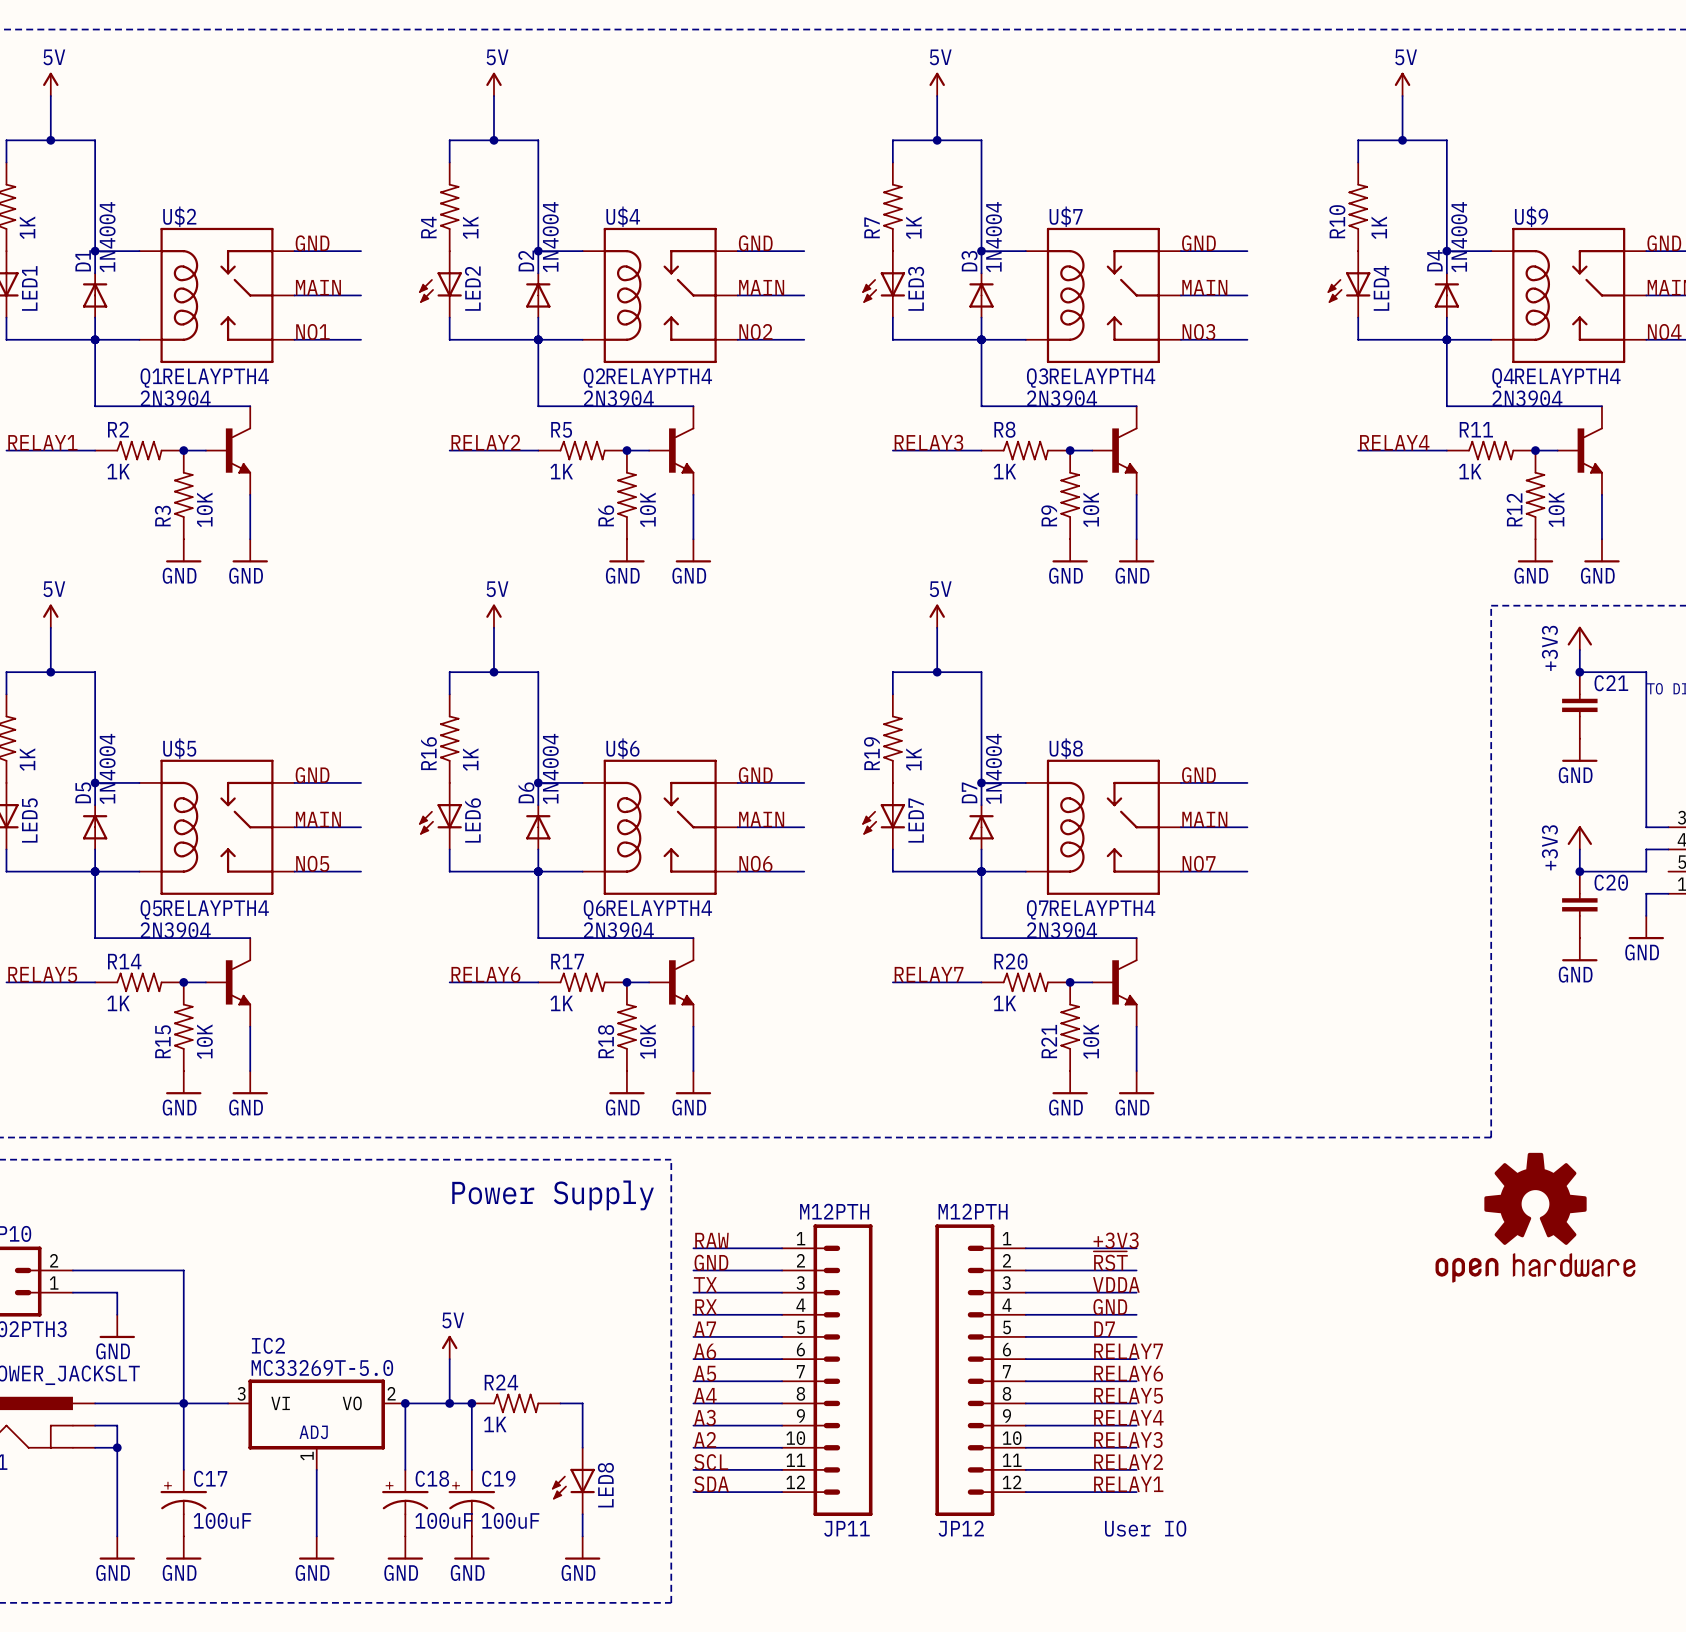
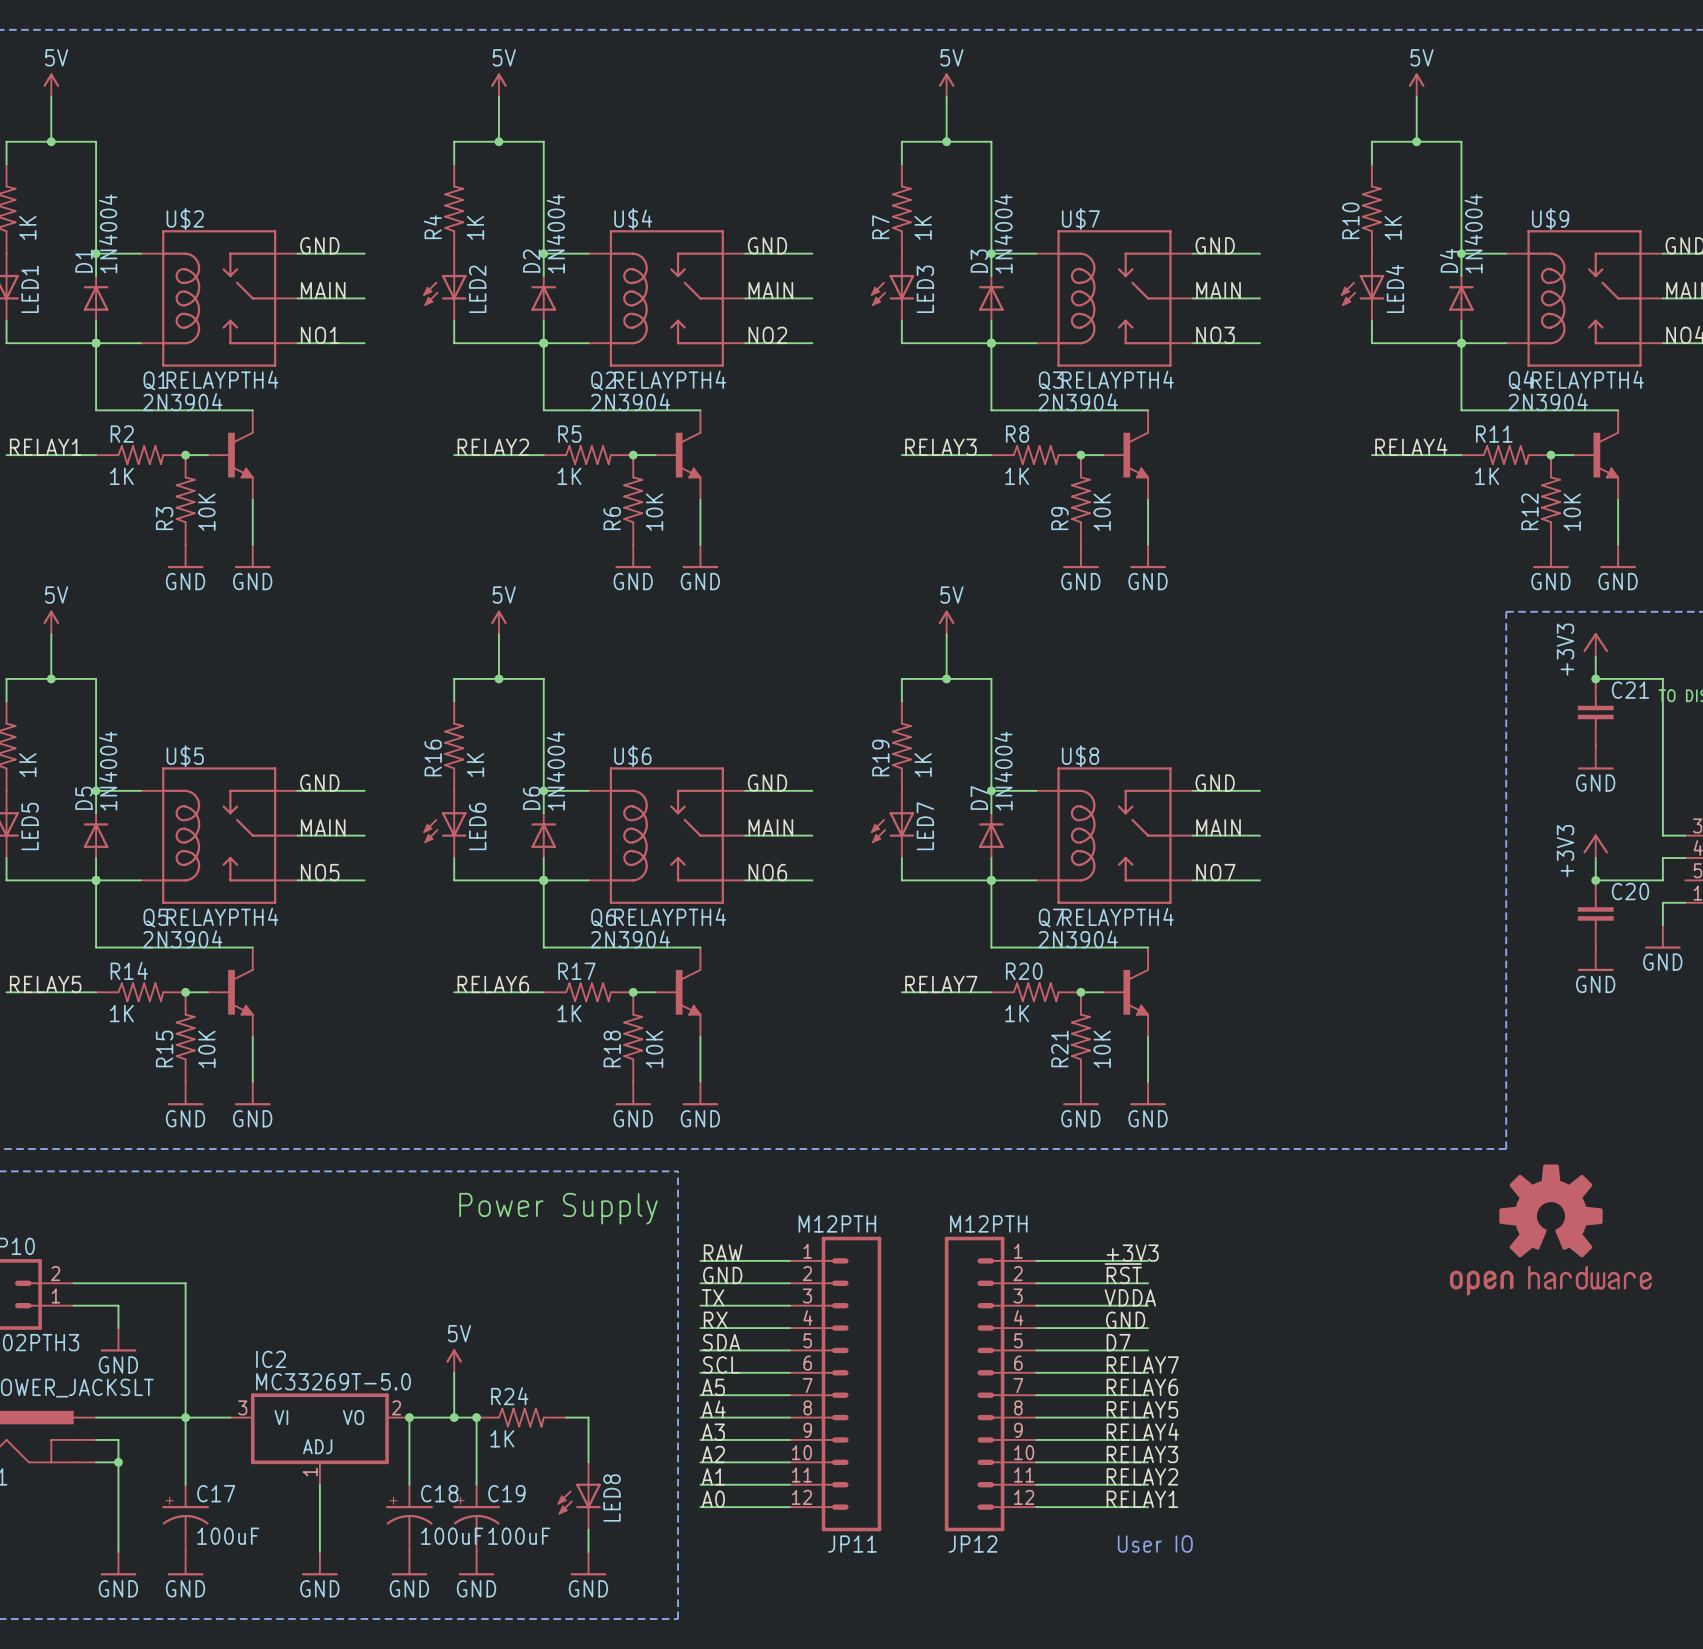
label: A7 (705, 1329) -> SDA (721, 1342)
label: A6 (705, 1351) -> SCL (721, 1364)
label: SCL (711, 1462) -> A1 (713, 1476)
label: SDA (711, 1484) -> A0 (713, 1499)

